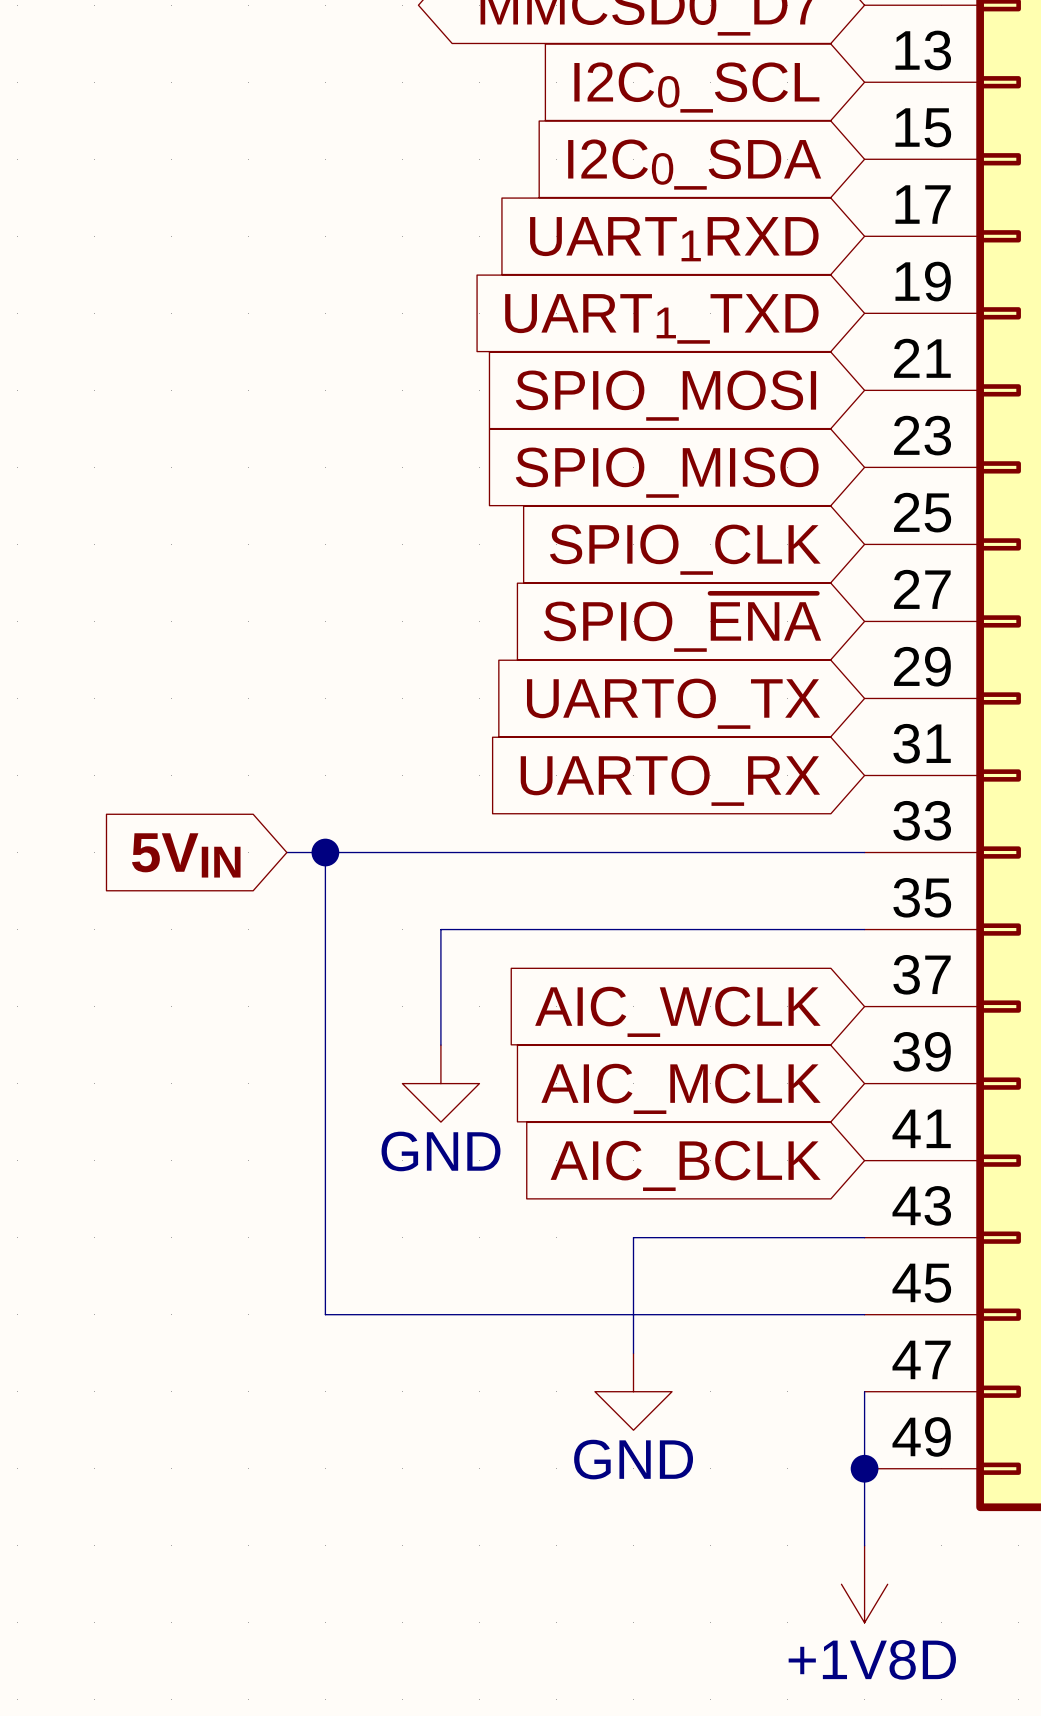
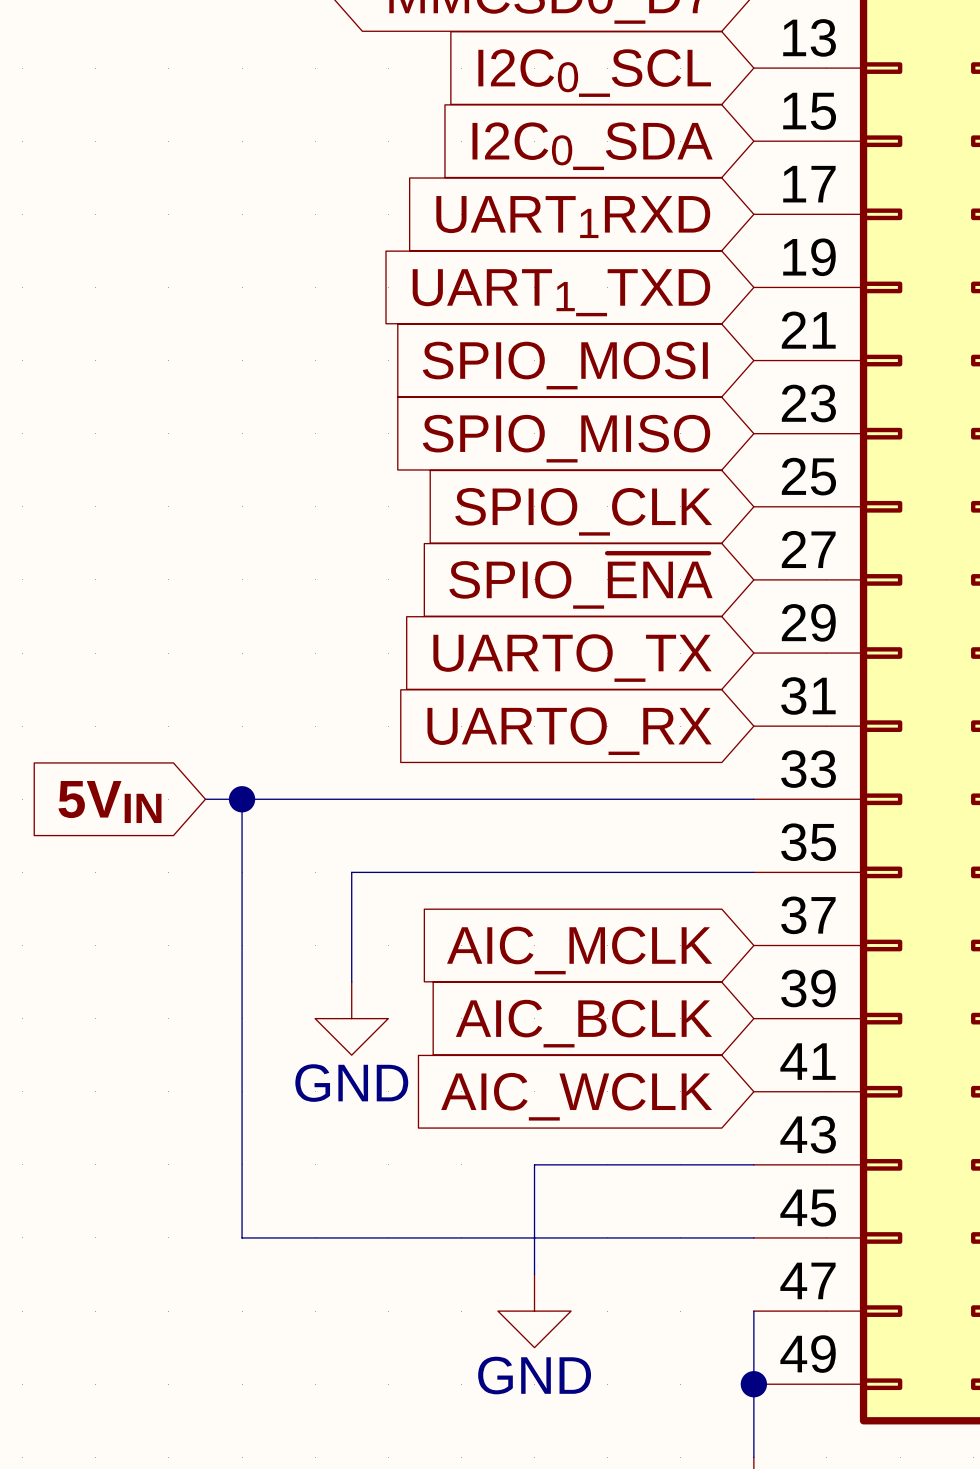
global label: AIC_WCLK (677, 1011) -> AIC_MCLK (579, 950)
global label: AIC_MCLK (681, 1088) -> AIC_BCLK (584, 1023)
global label: AIC_BCLK (685, 1165) -> AIC_WCLK (576, 1096)

